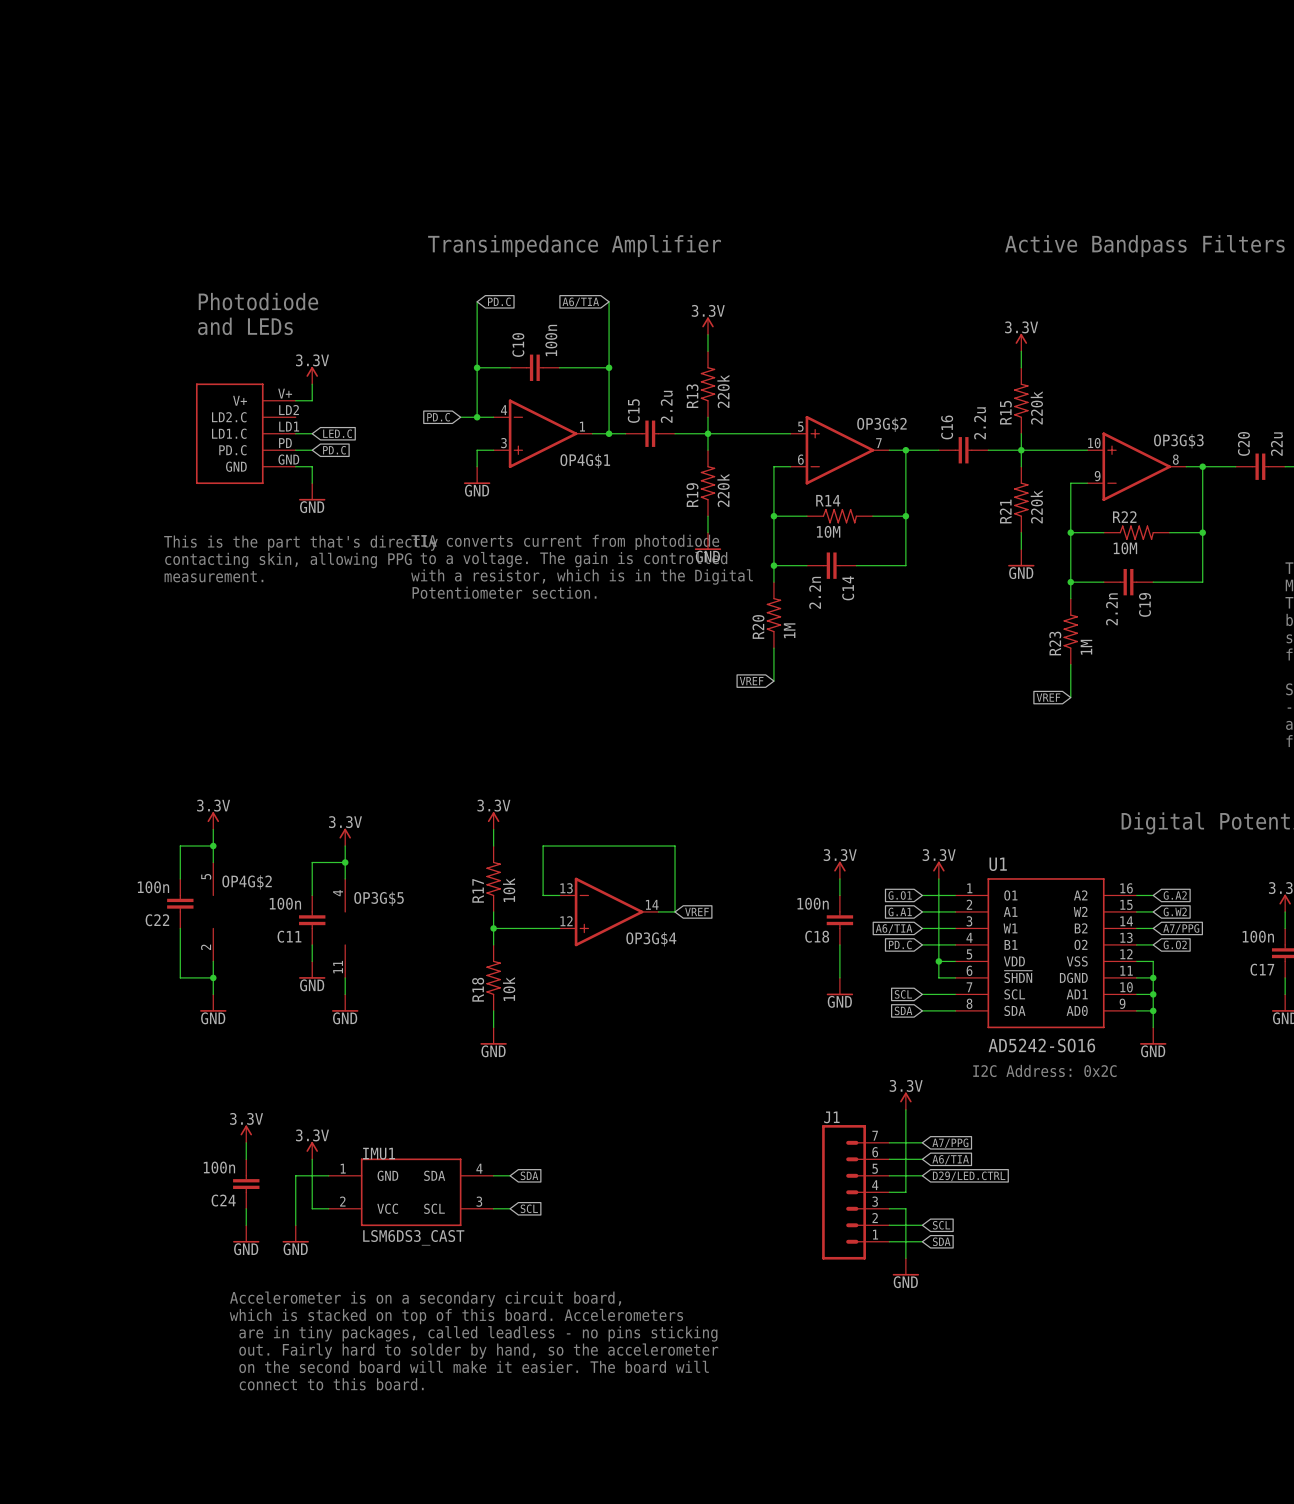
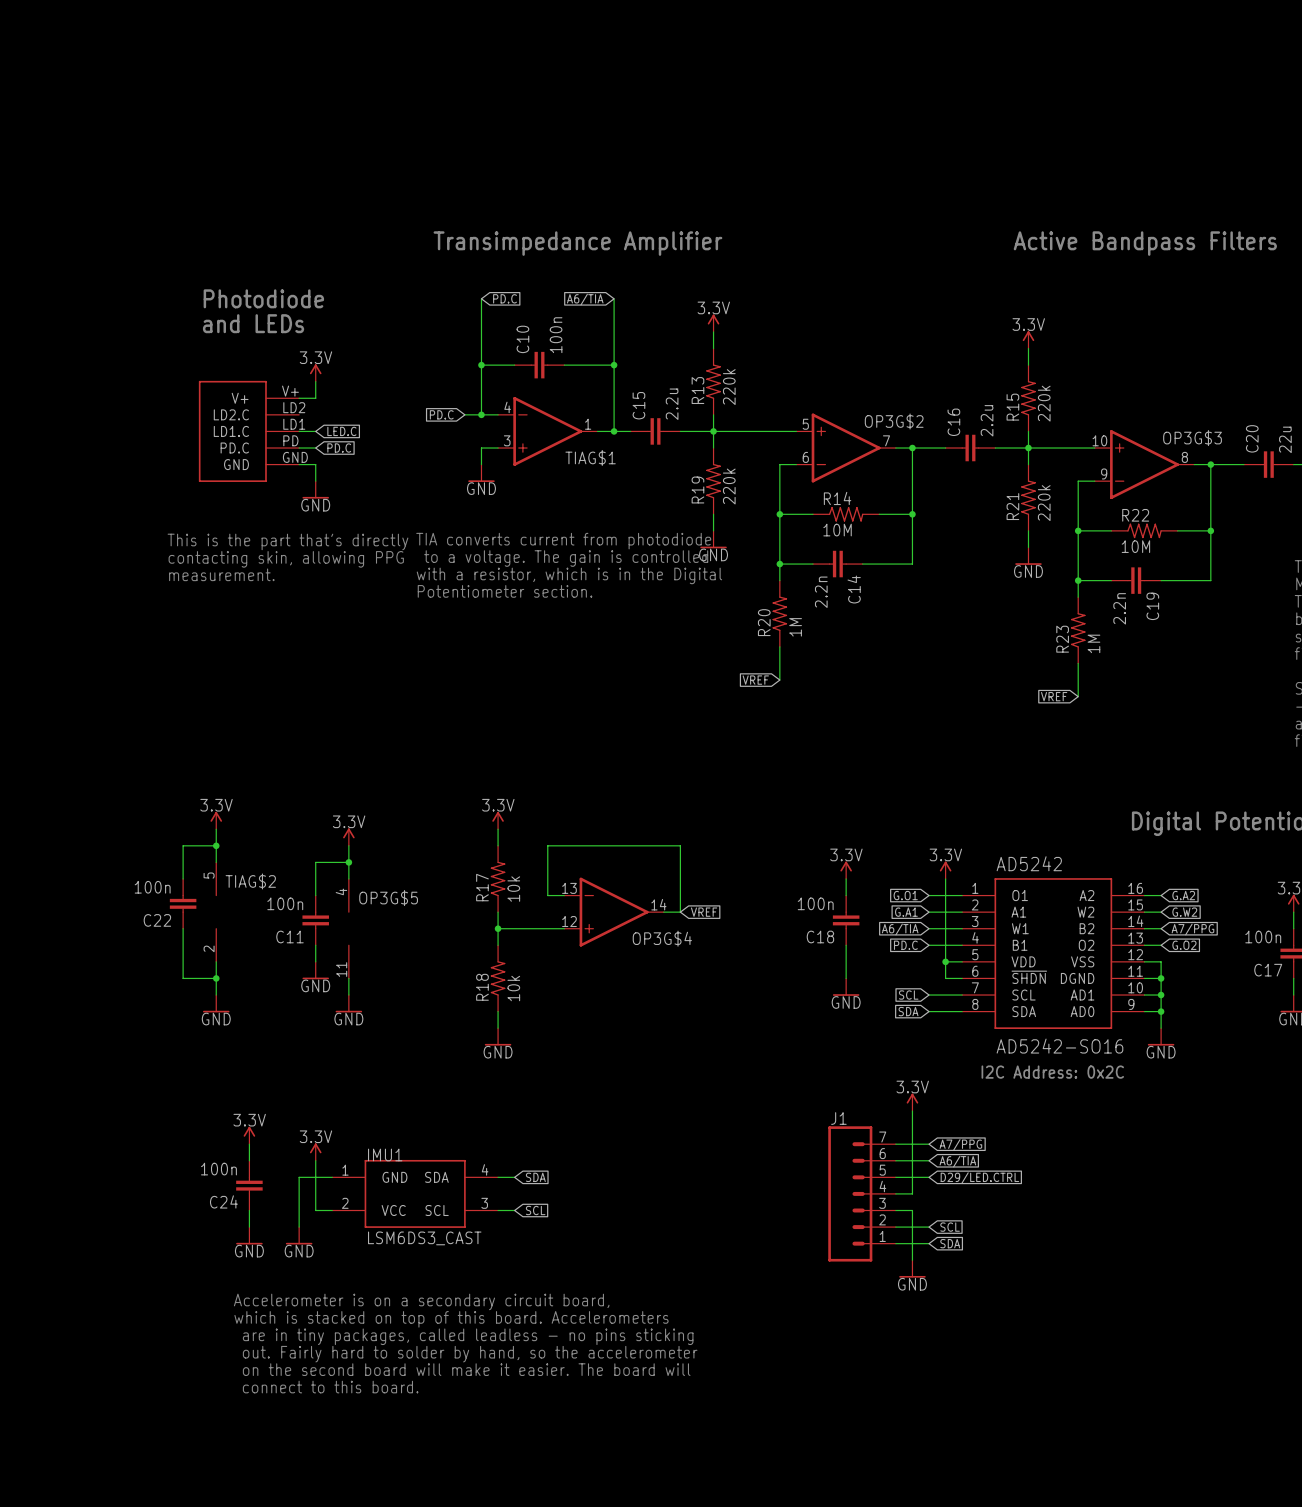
OP4G$1 name: OP4G$1 (585, 461) -> TIAG$1 (590, 457)
U1 name: U1 (998, 864) -> AD5242 (1029, 863)
OP4G$2 name: OP4G$2 (247, 882) -> TIAG$2 (250, 881)

